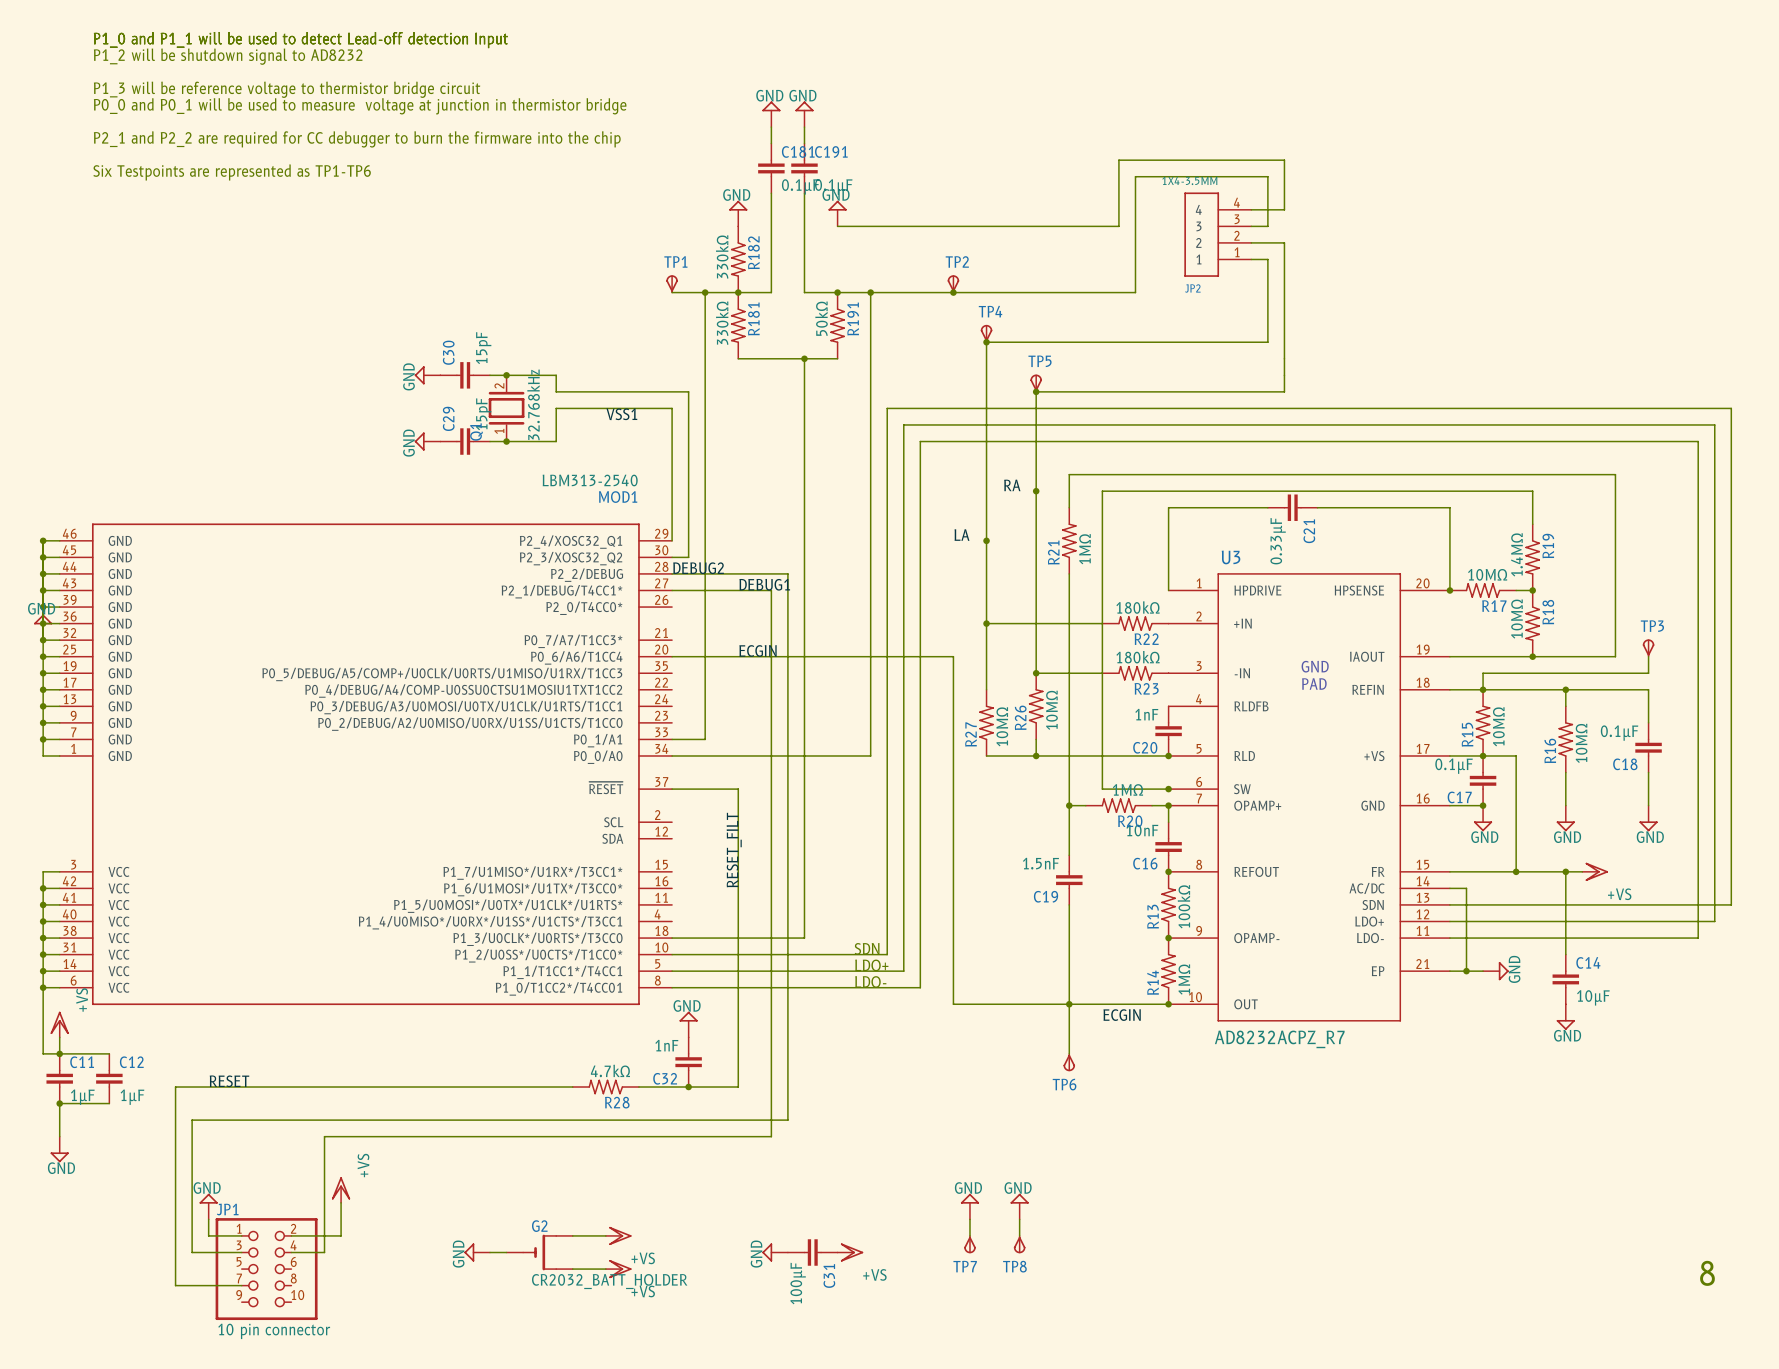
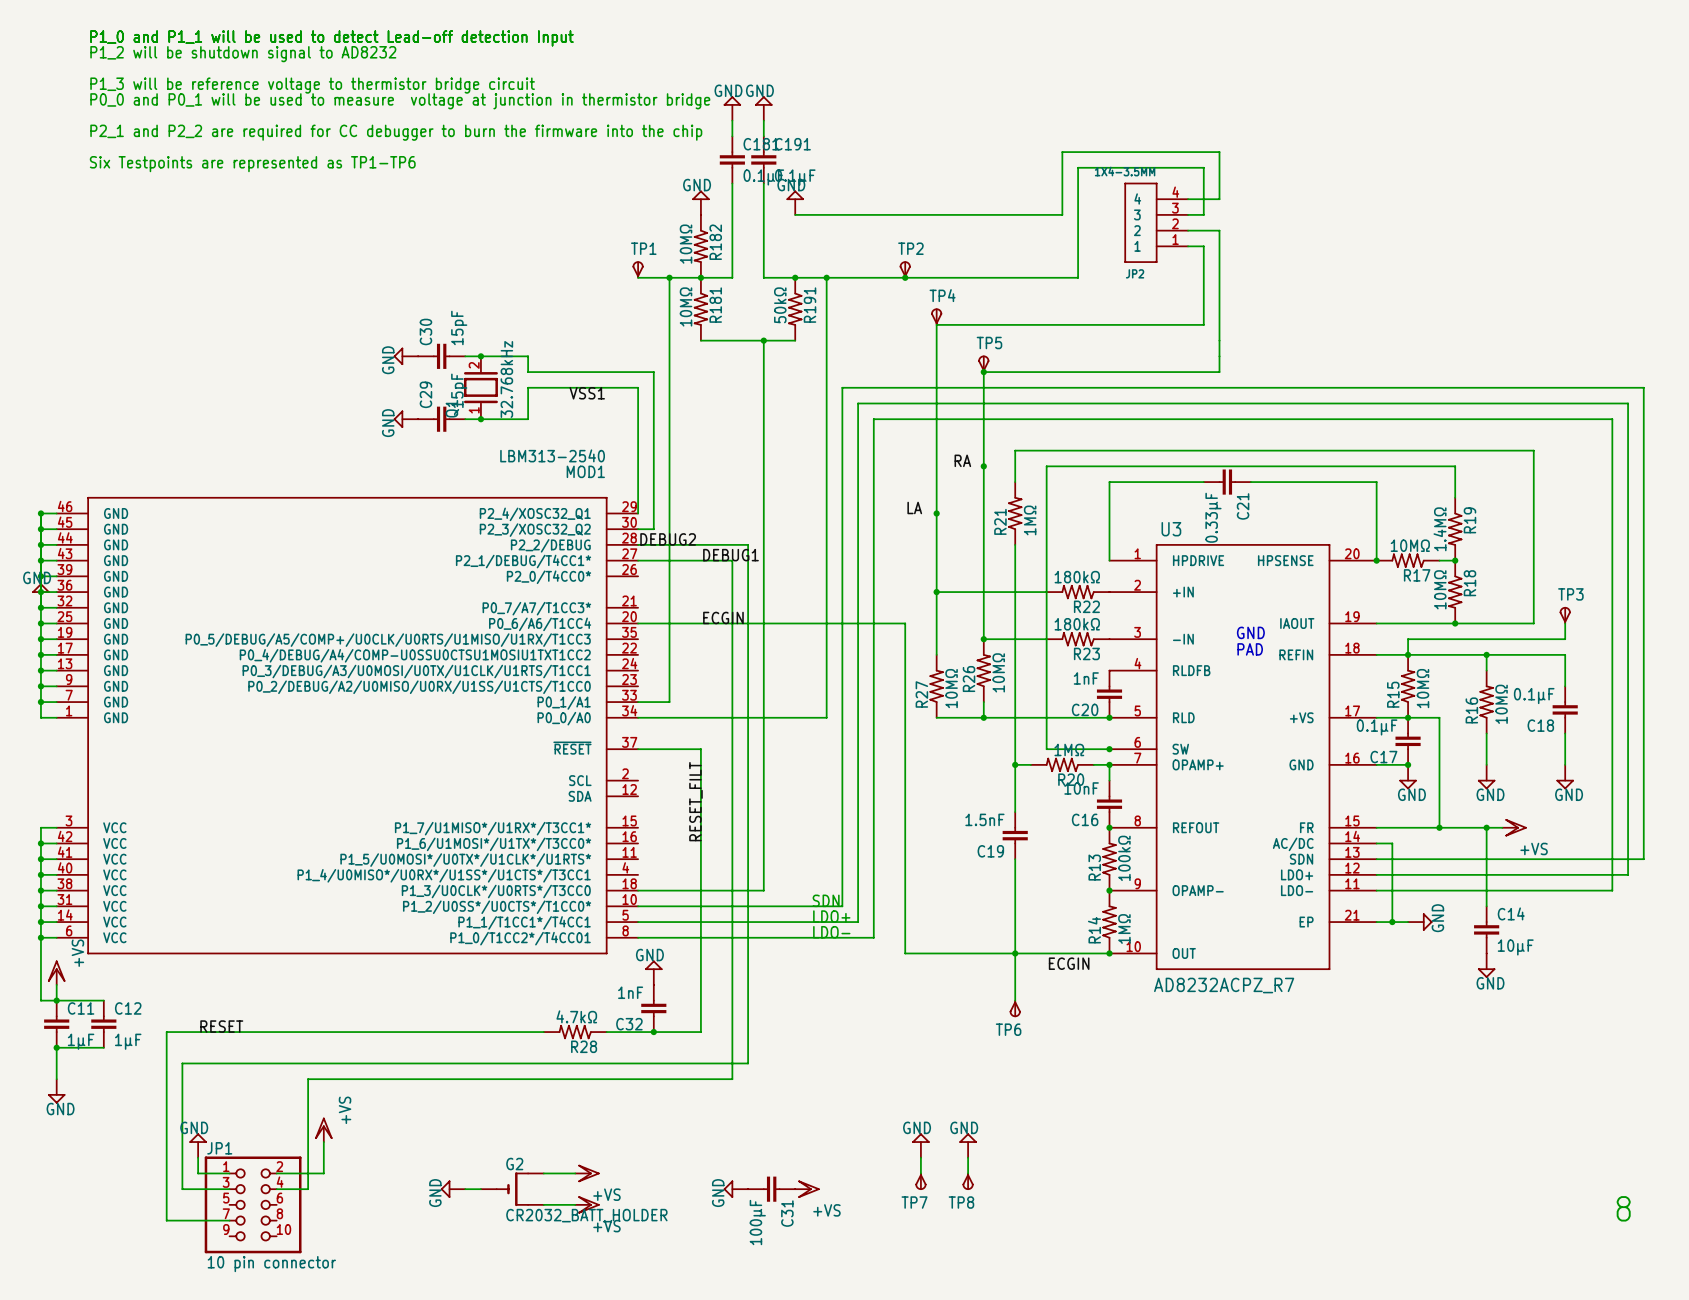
R182 value: 330kΩ (722, 256) -> 10MΩ (686, 244)
R181 value: 330kΩ (722, 323) -> 10MΩ (686, 306)
junction: (986, 342) -> none

